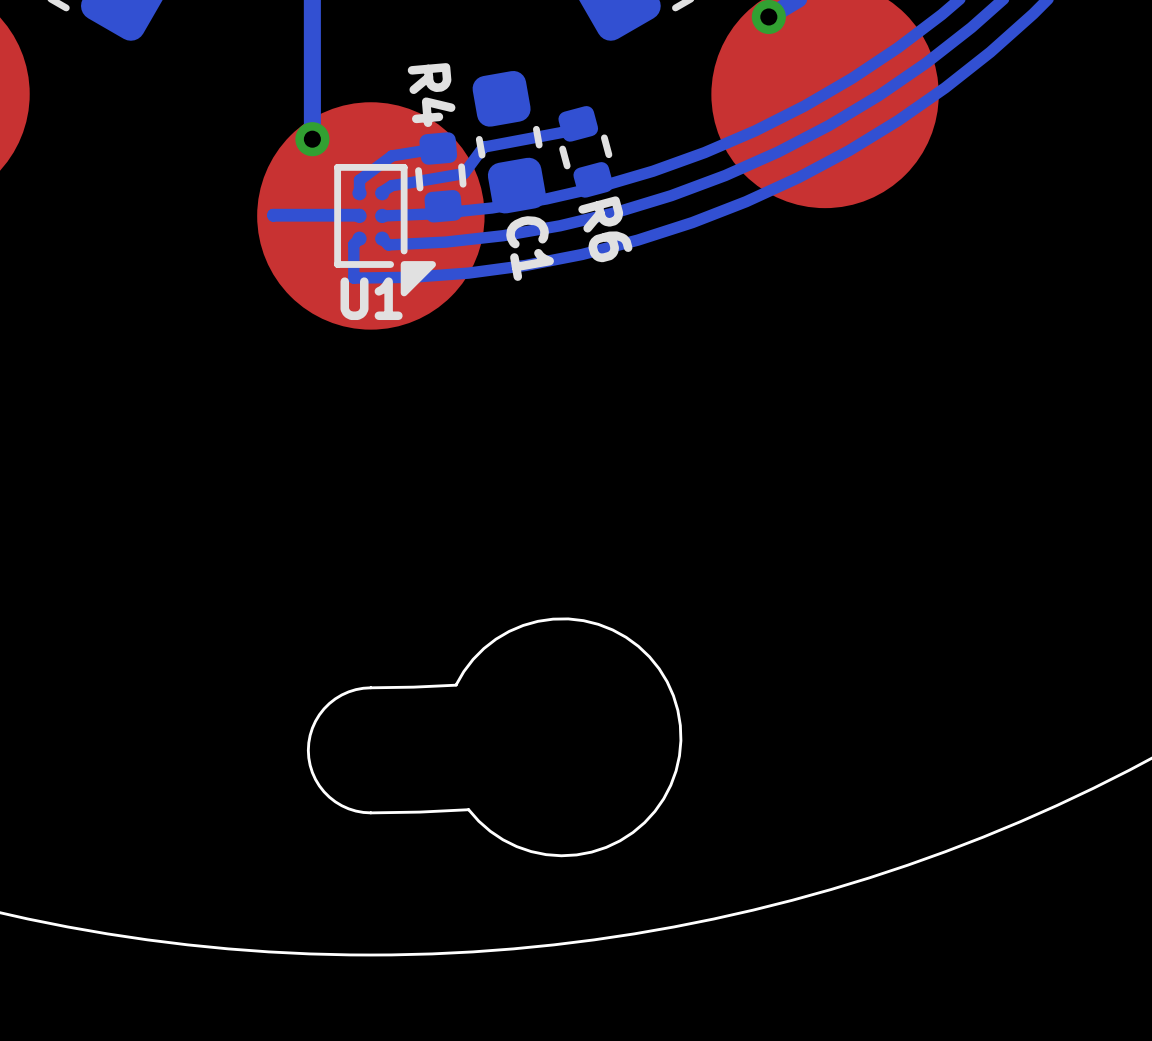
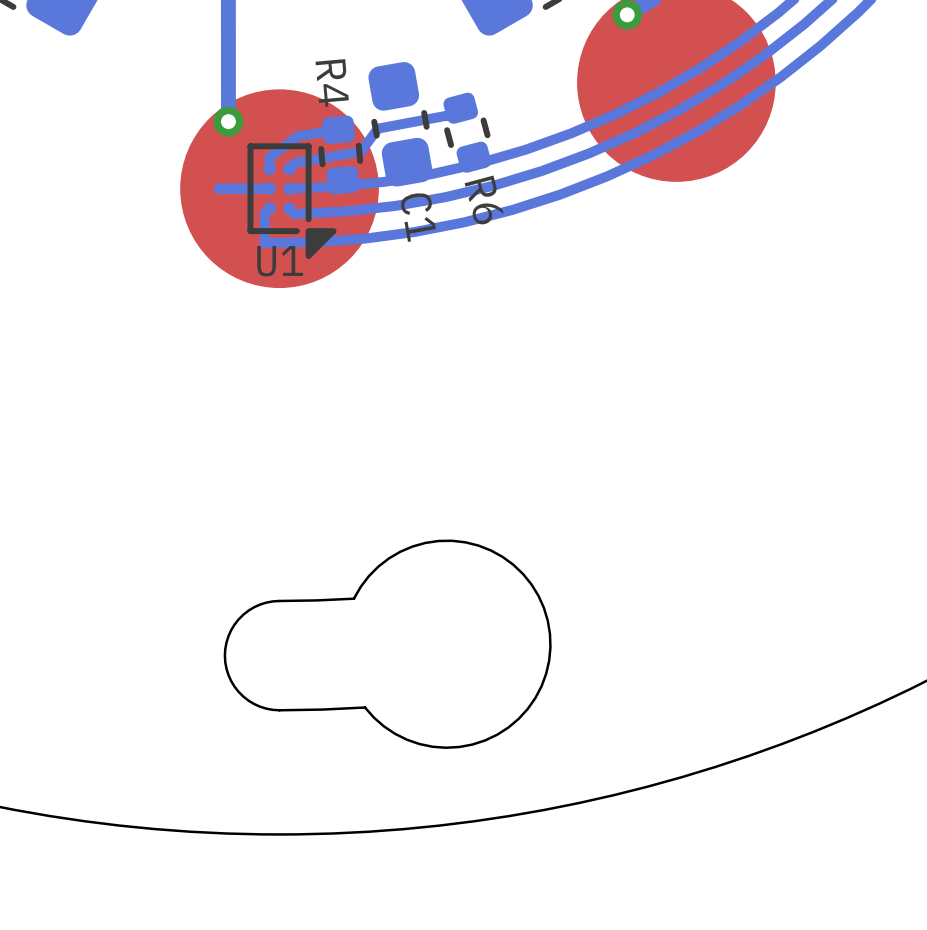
bottom track: (359, 215) (273, 214) (301, 215) -> none

